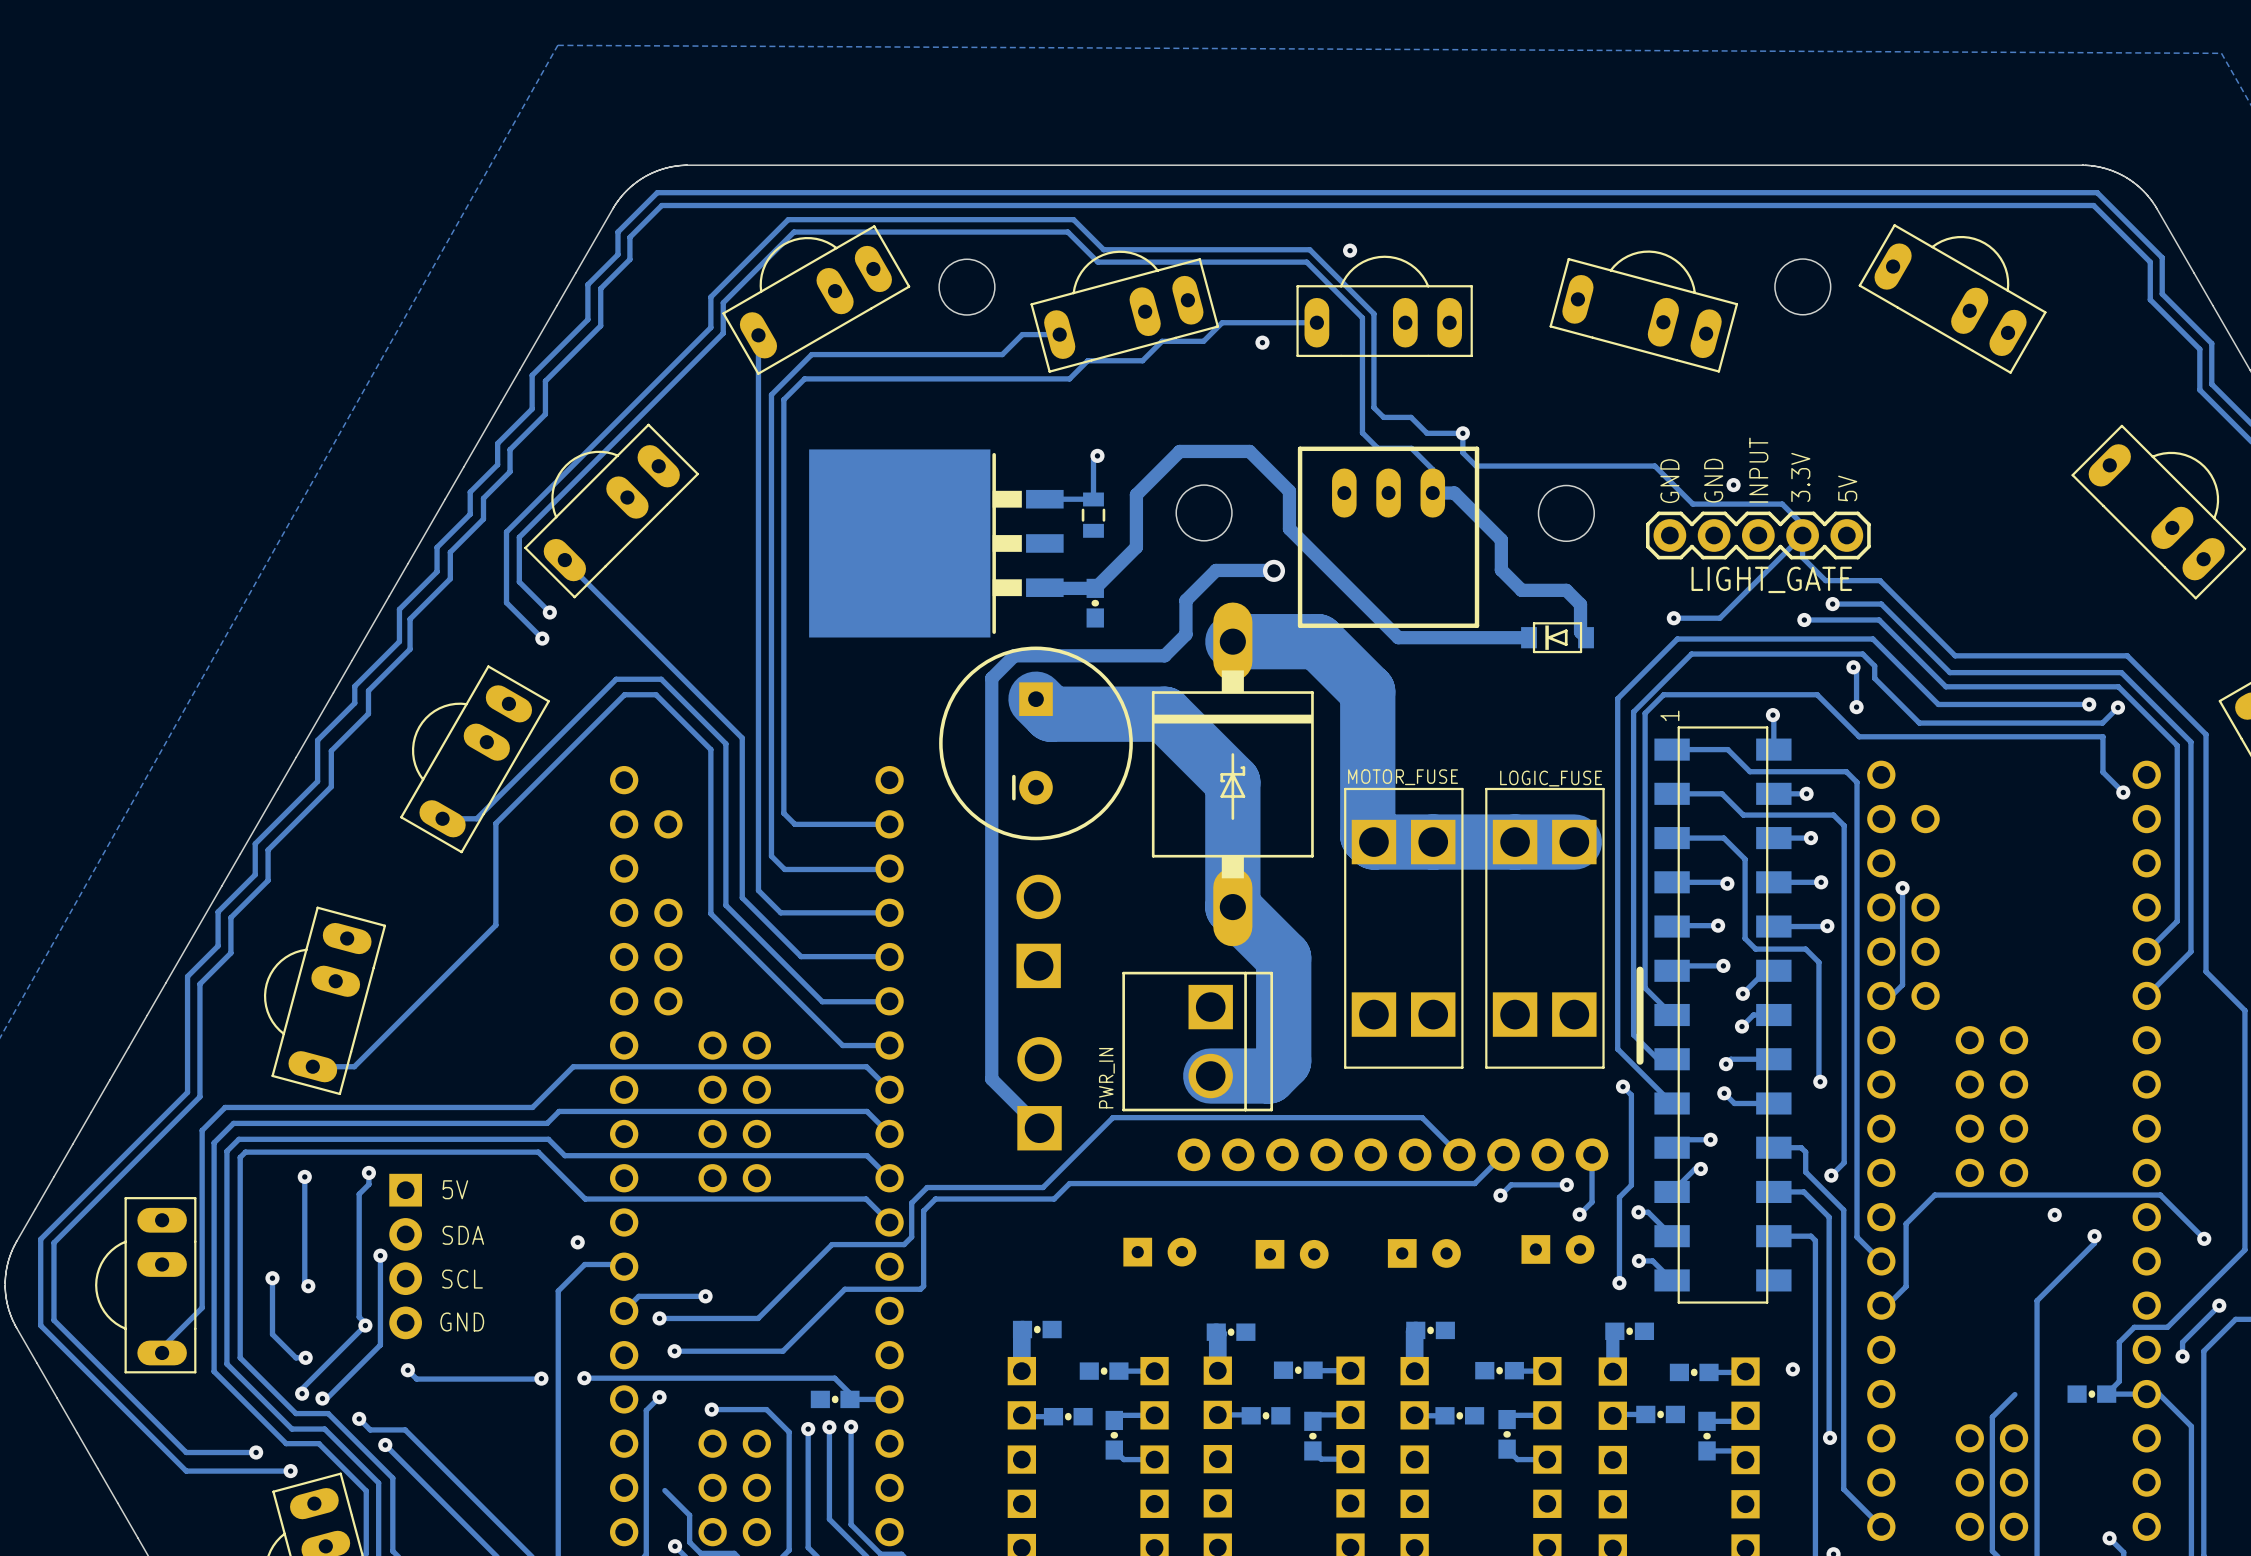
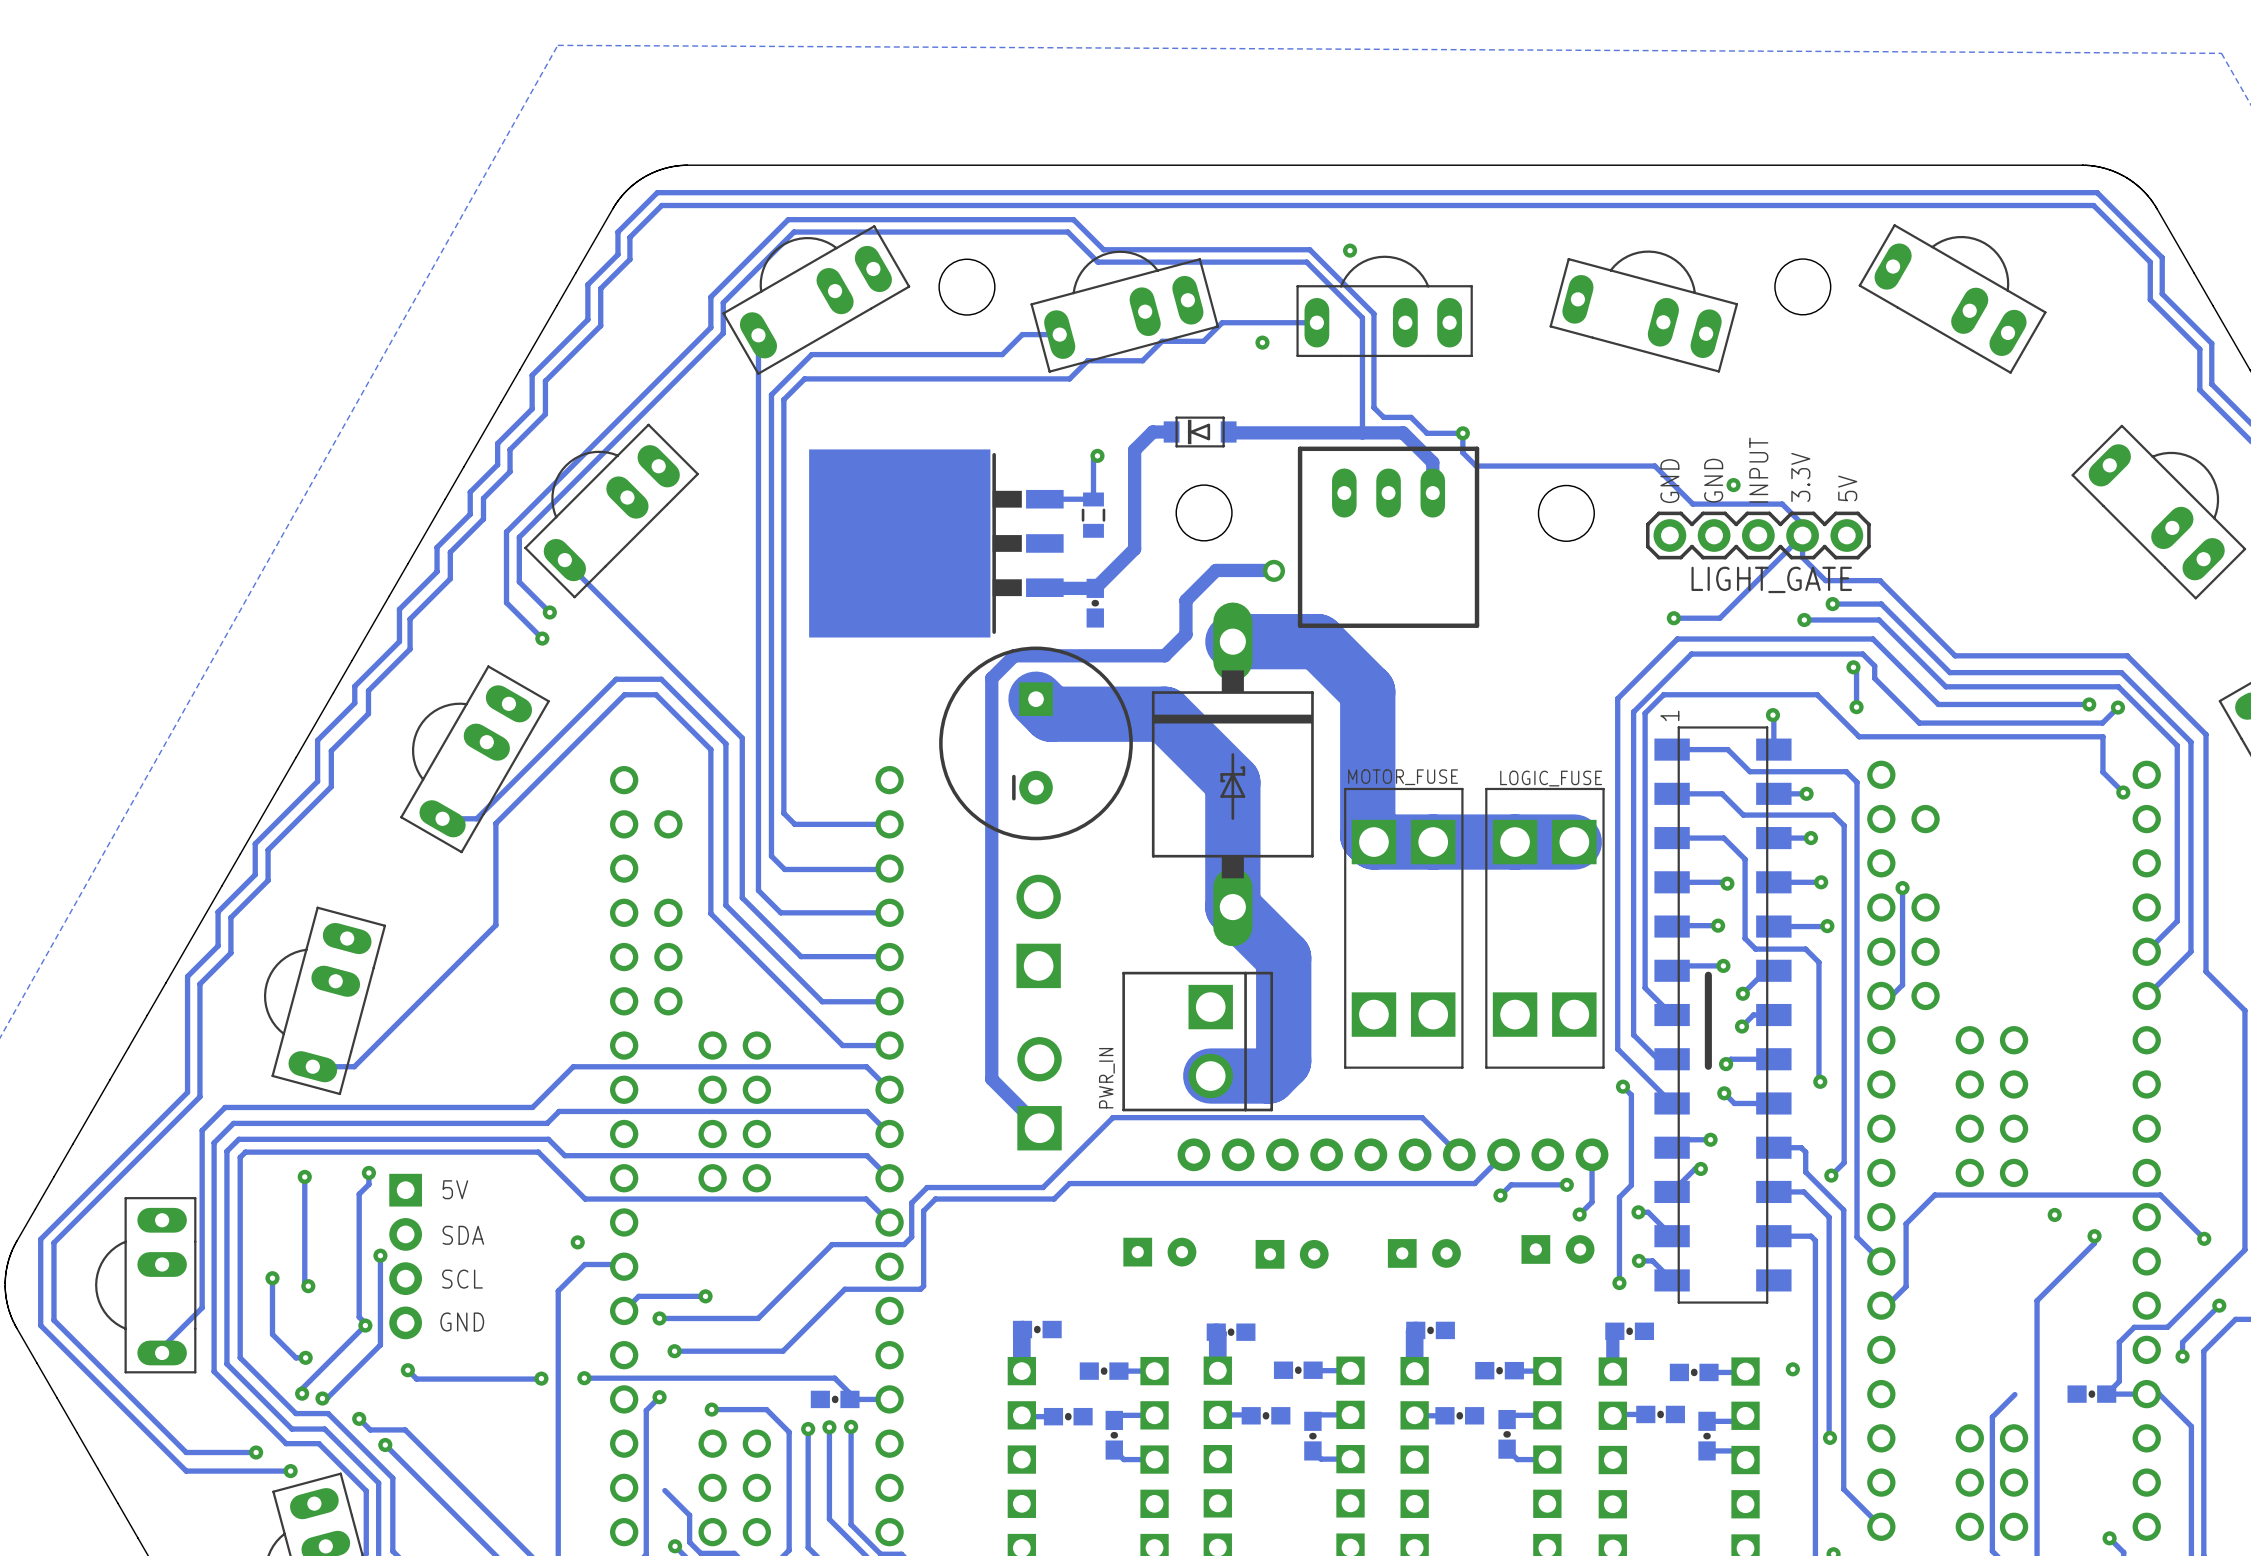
track: (1362, 432) (1377, 448) (1411, 448) (1432, 469) -> (1228, 431) (1403, 432) (1432, 462) (1432, 469)
track: (1432, 493) (1454, 493) (1501, 539) (1501, 570) (1521, 590) (1566, 590) (1580, 604) (1580, 632) (1586, 637) -> none
track: (1134, 549) (1136, 547) (1136, 494) (1179, 451) (1249, 451) (1289, 491) (1289, 528) (1398, 637) (1529, 637) -> (1134, 549) (1134, 450) (1152, 431) (1171, 431)
part position: (1557, 637) -> (1200, 431)
line: (1640, 970) (1640, 1061) -> (1708, 975) (1708, 1066)

